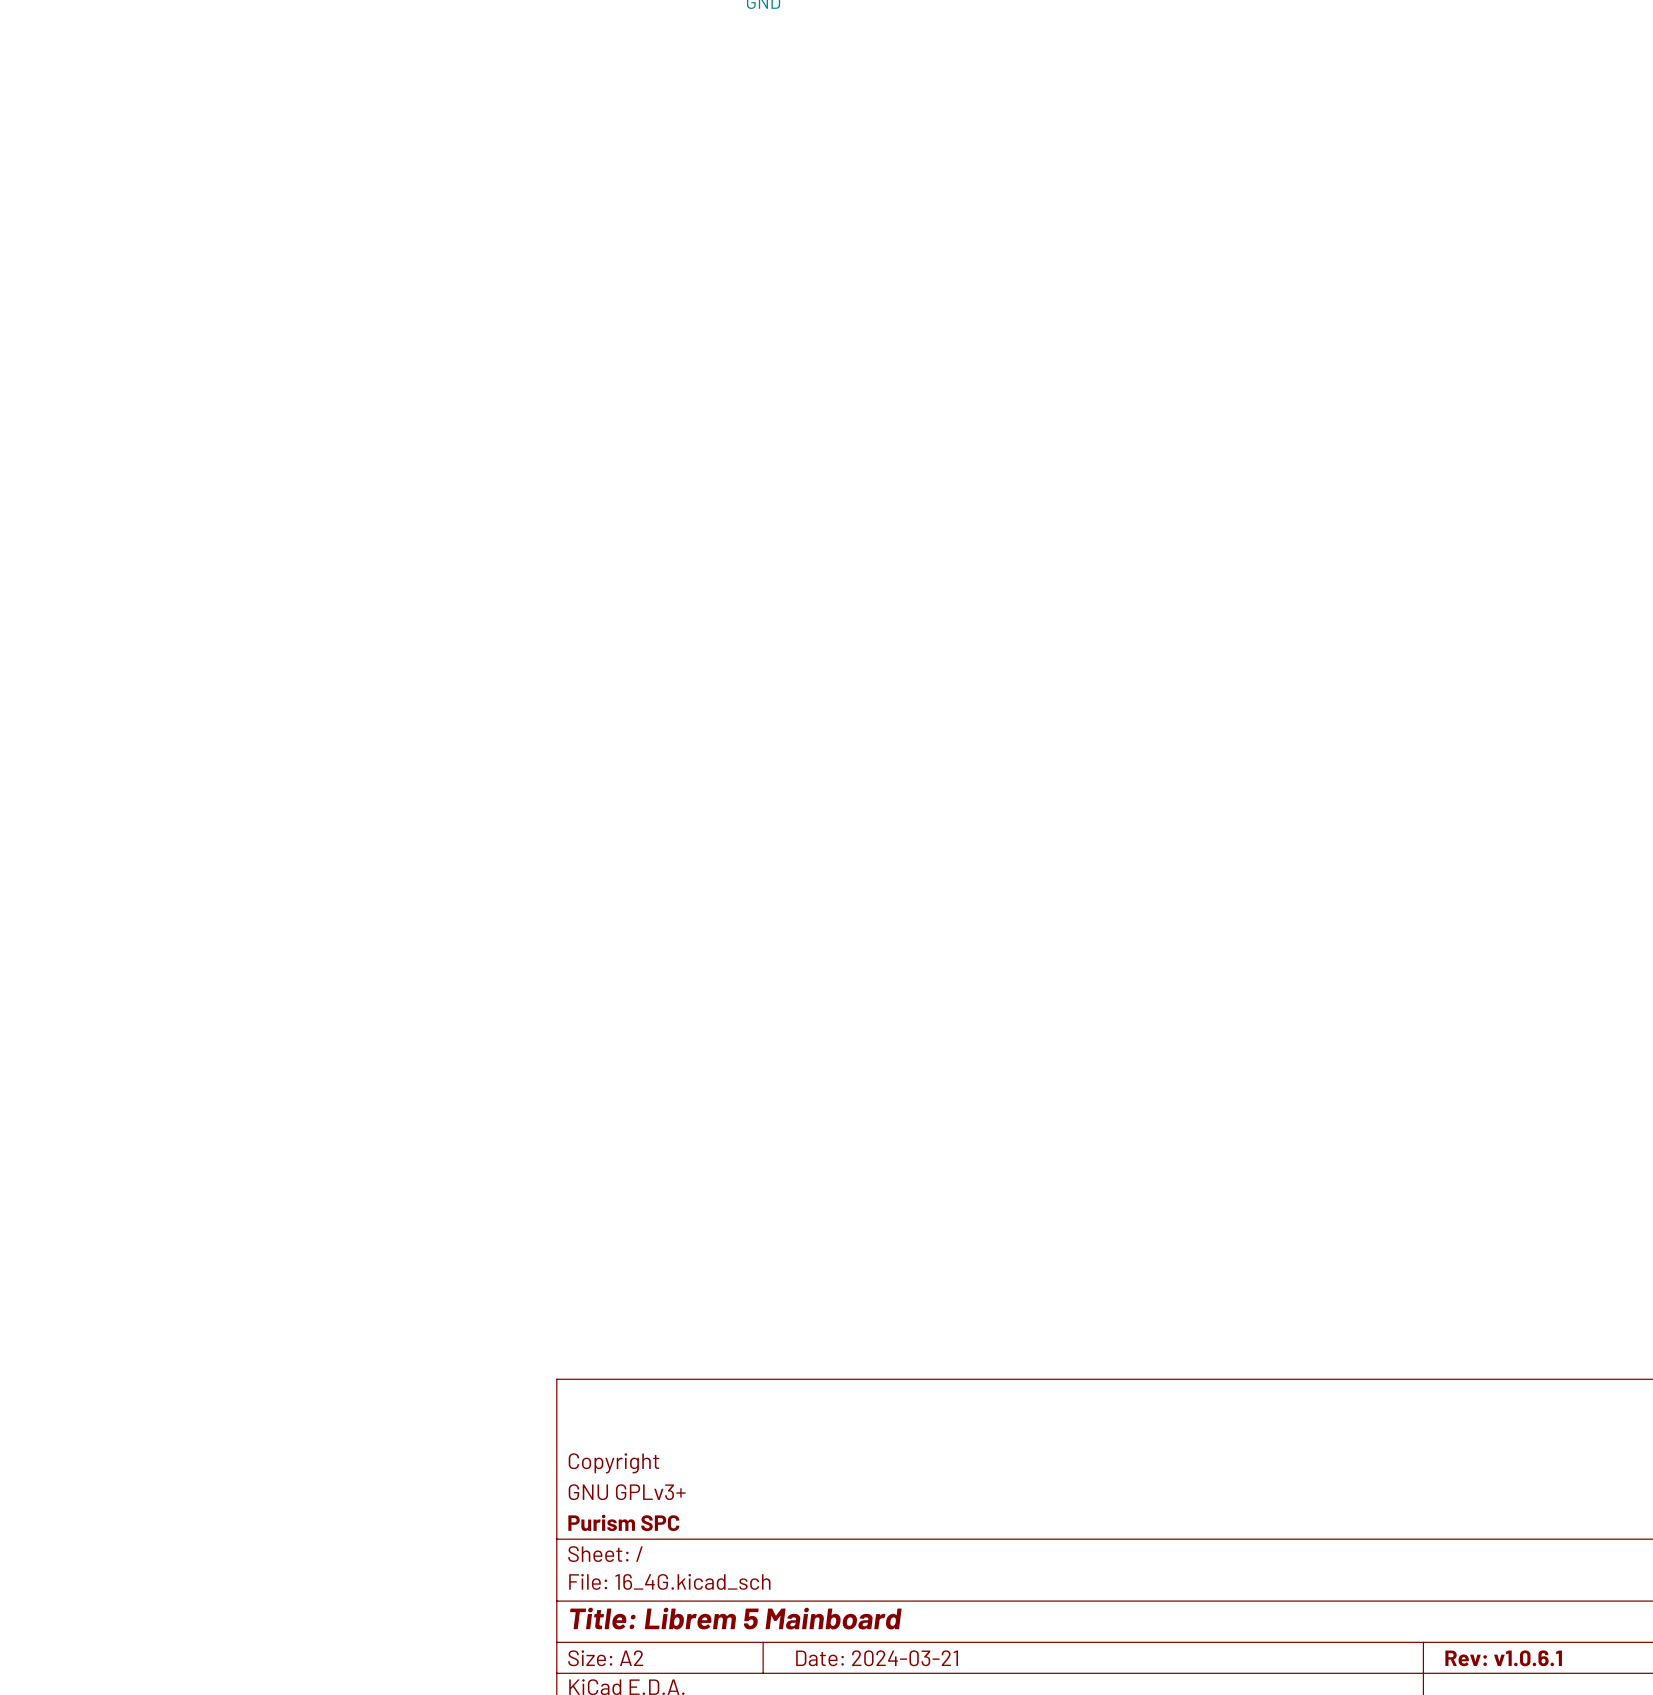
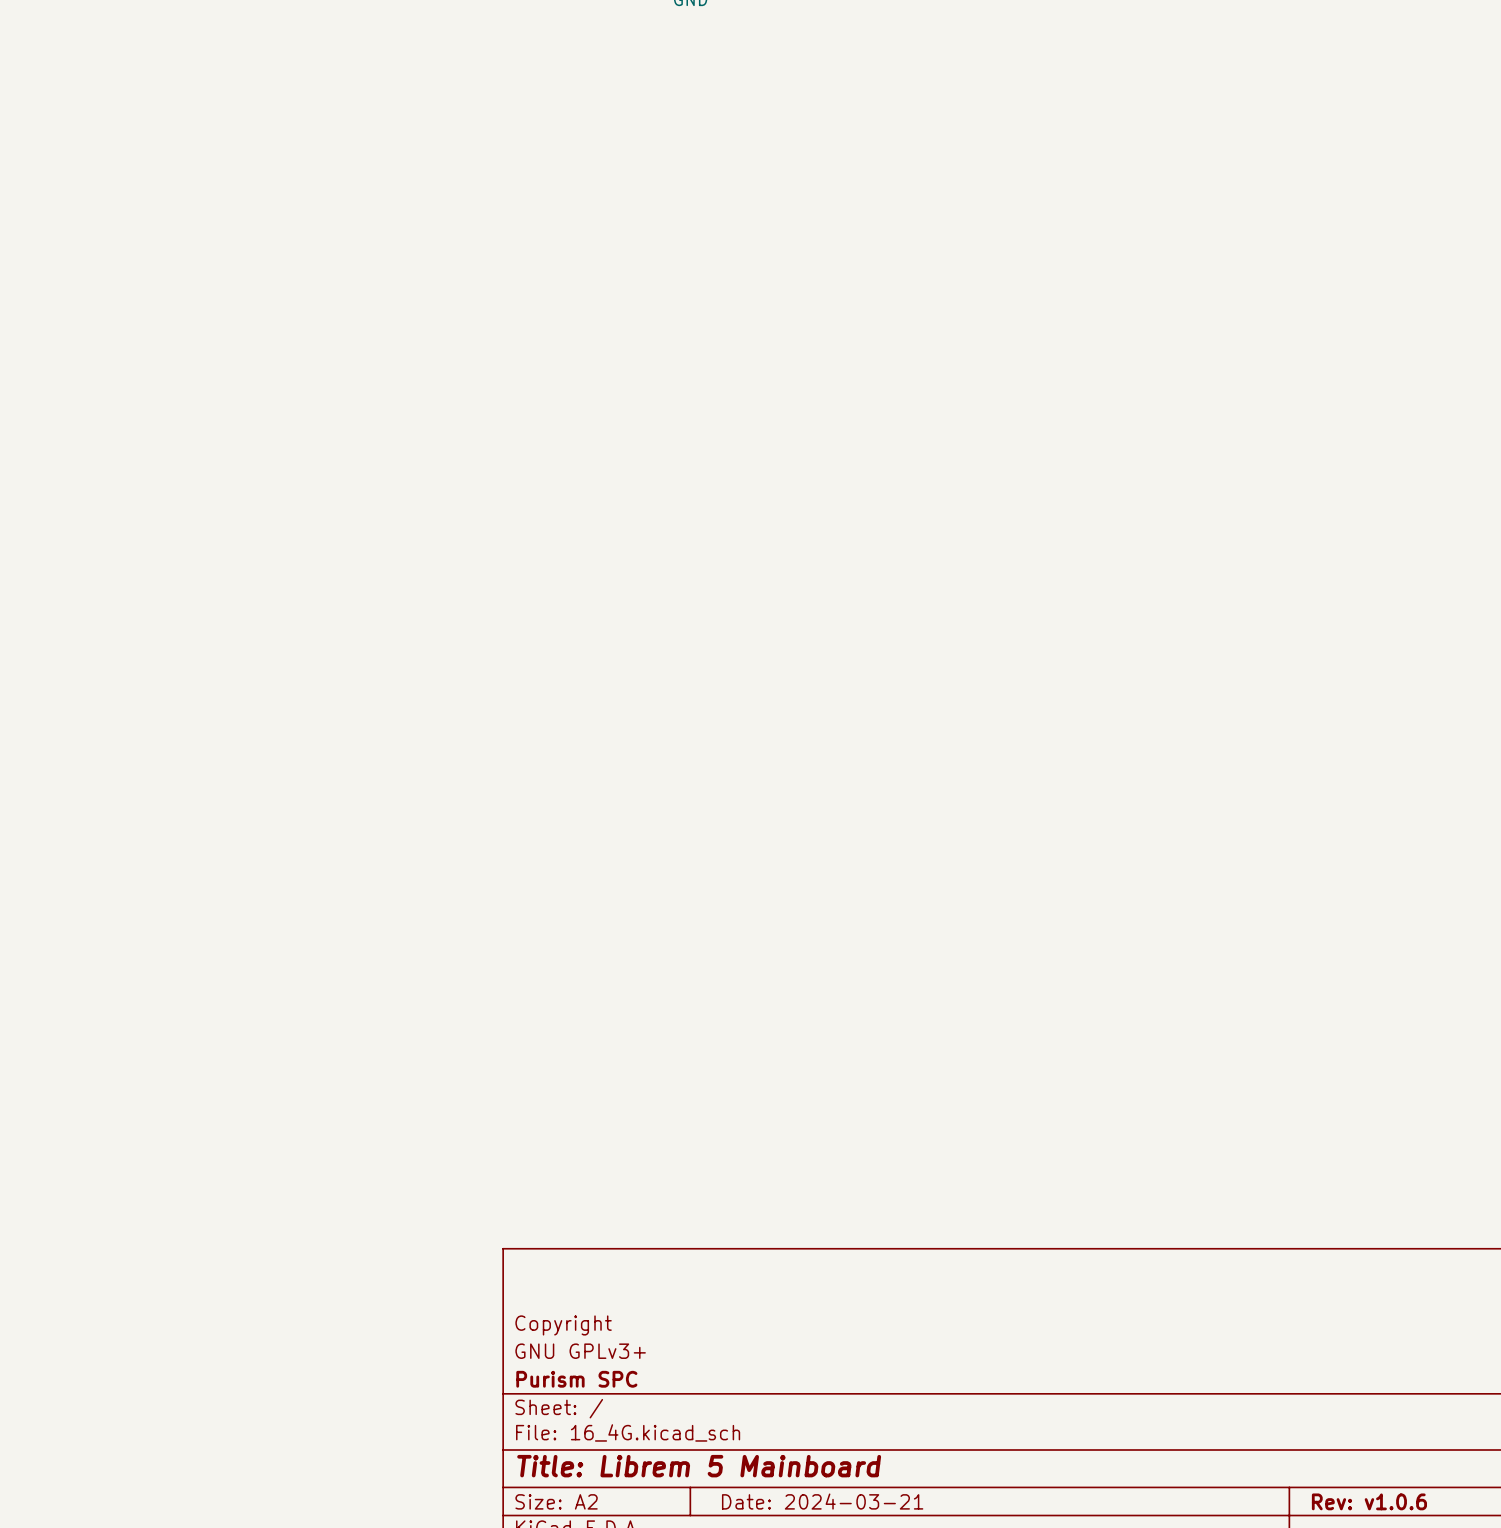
title block: Rev: v1.0.6.1 (1503, 1658) -> Rev: v1.0.6 (1369, 1501)

